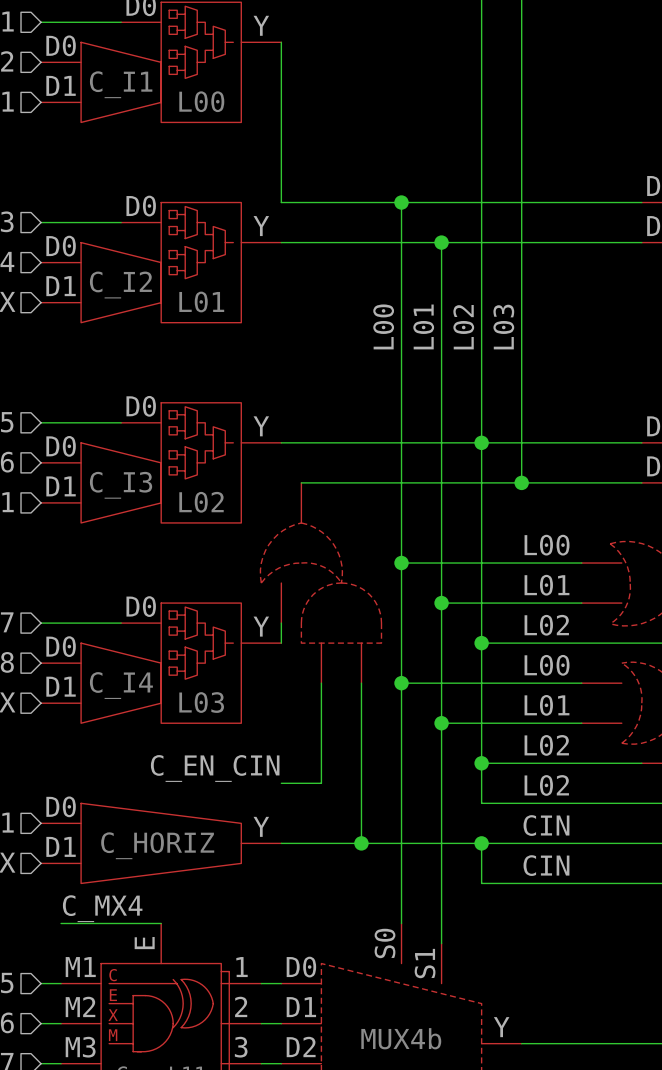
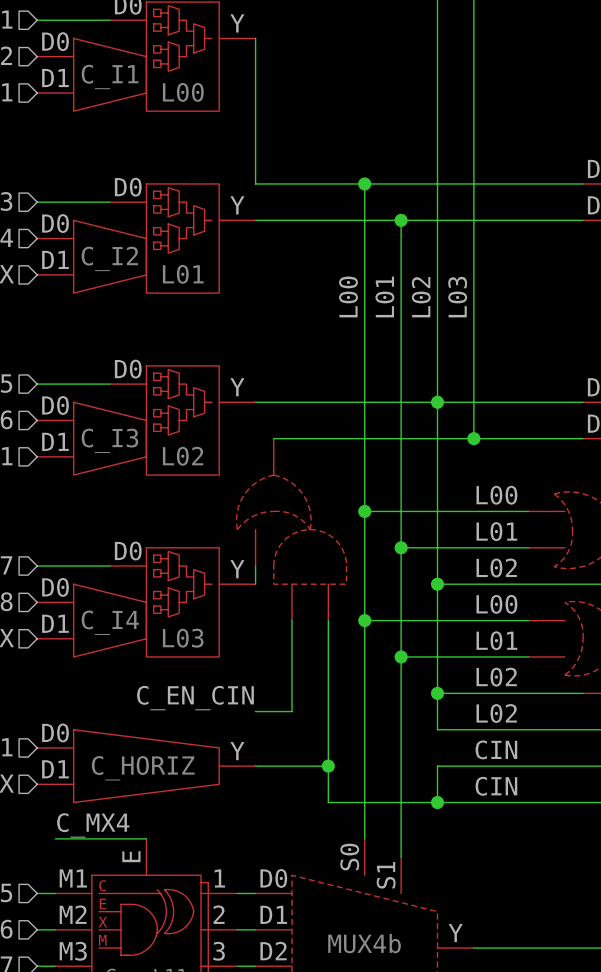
wire: (361, 843) (481, 843) -> (328, 766) (328, 802) (437, 802)
junction position: (481, 843) -> (437, 802)

